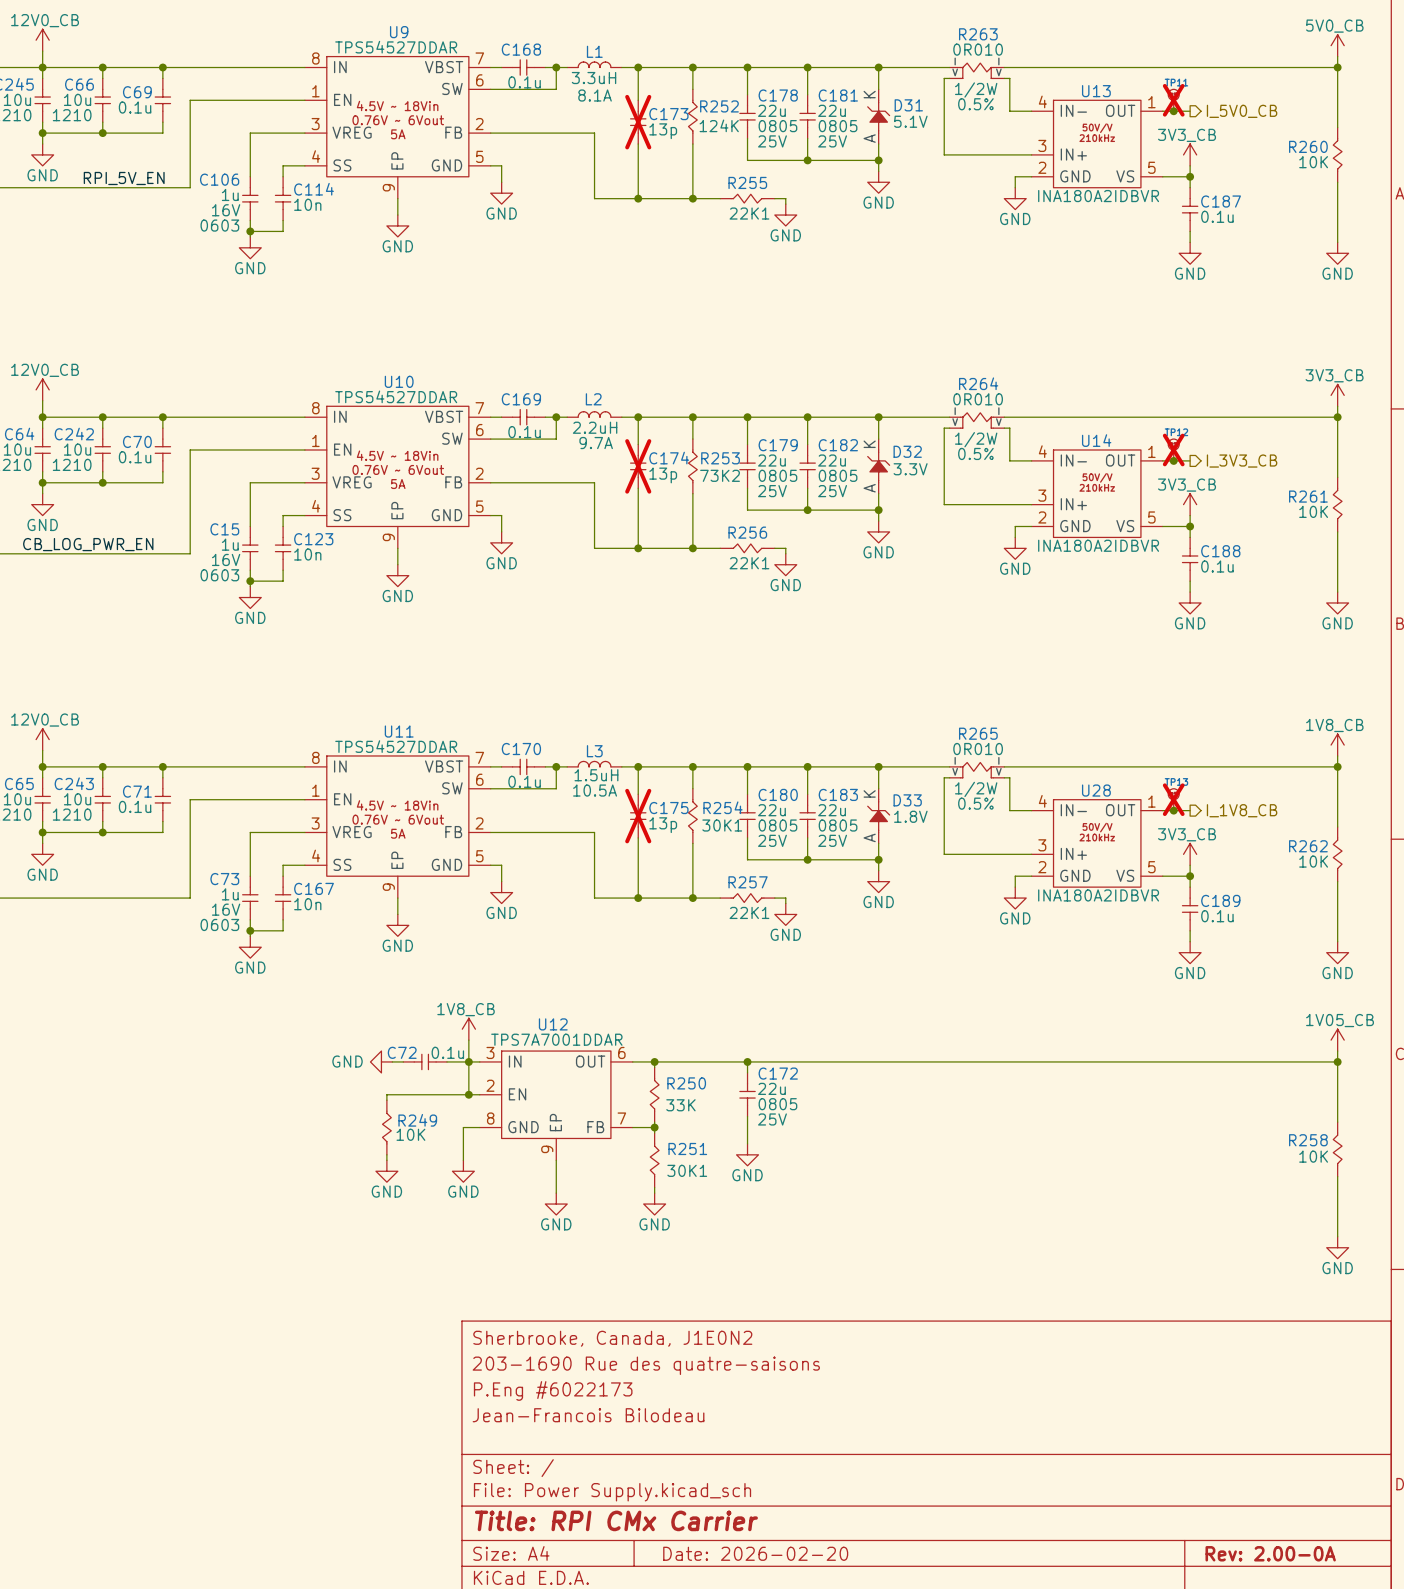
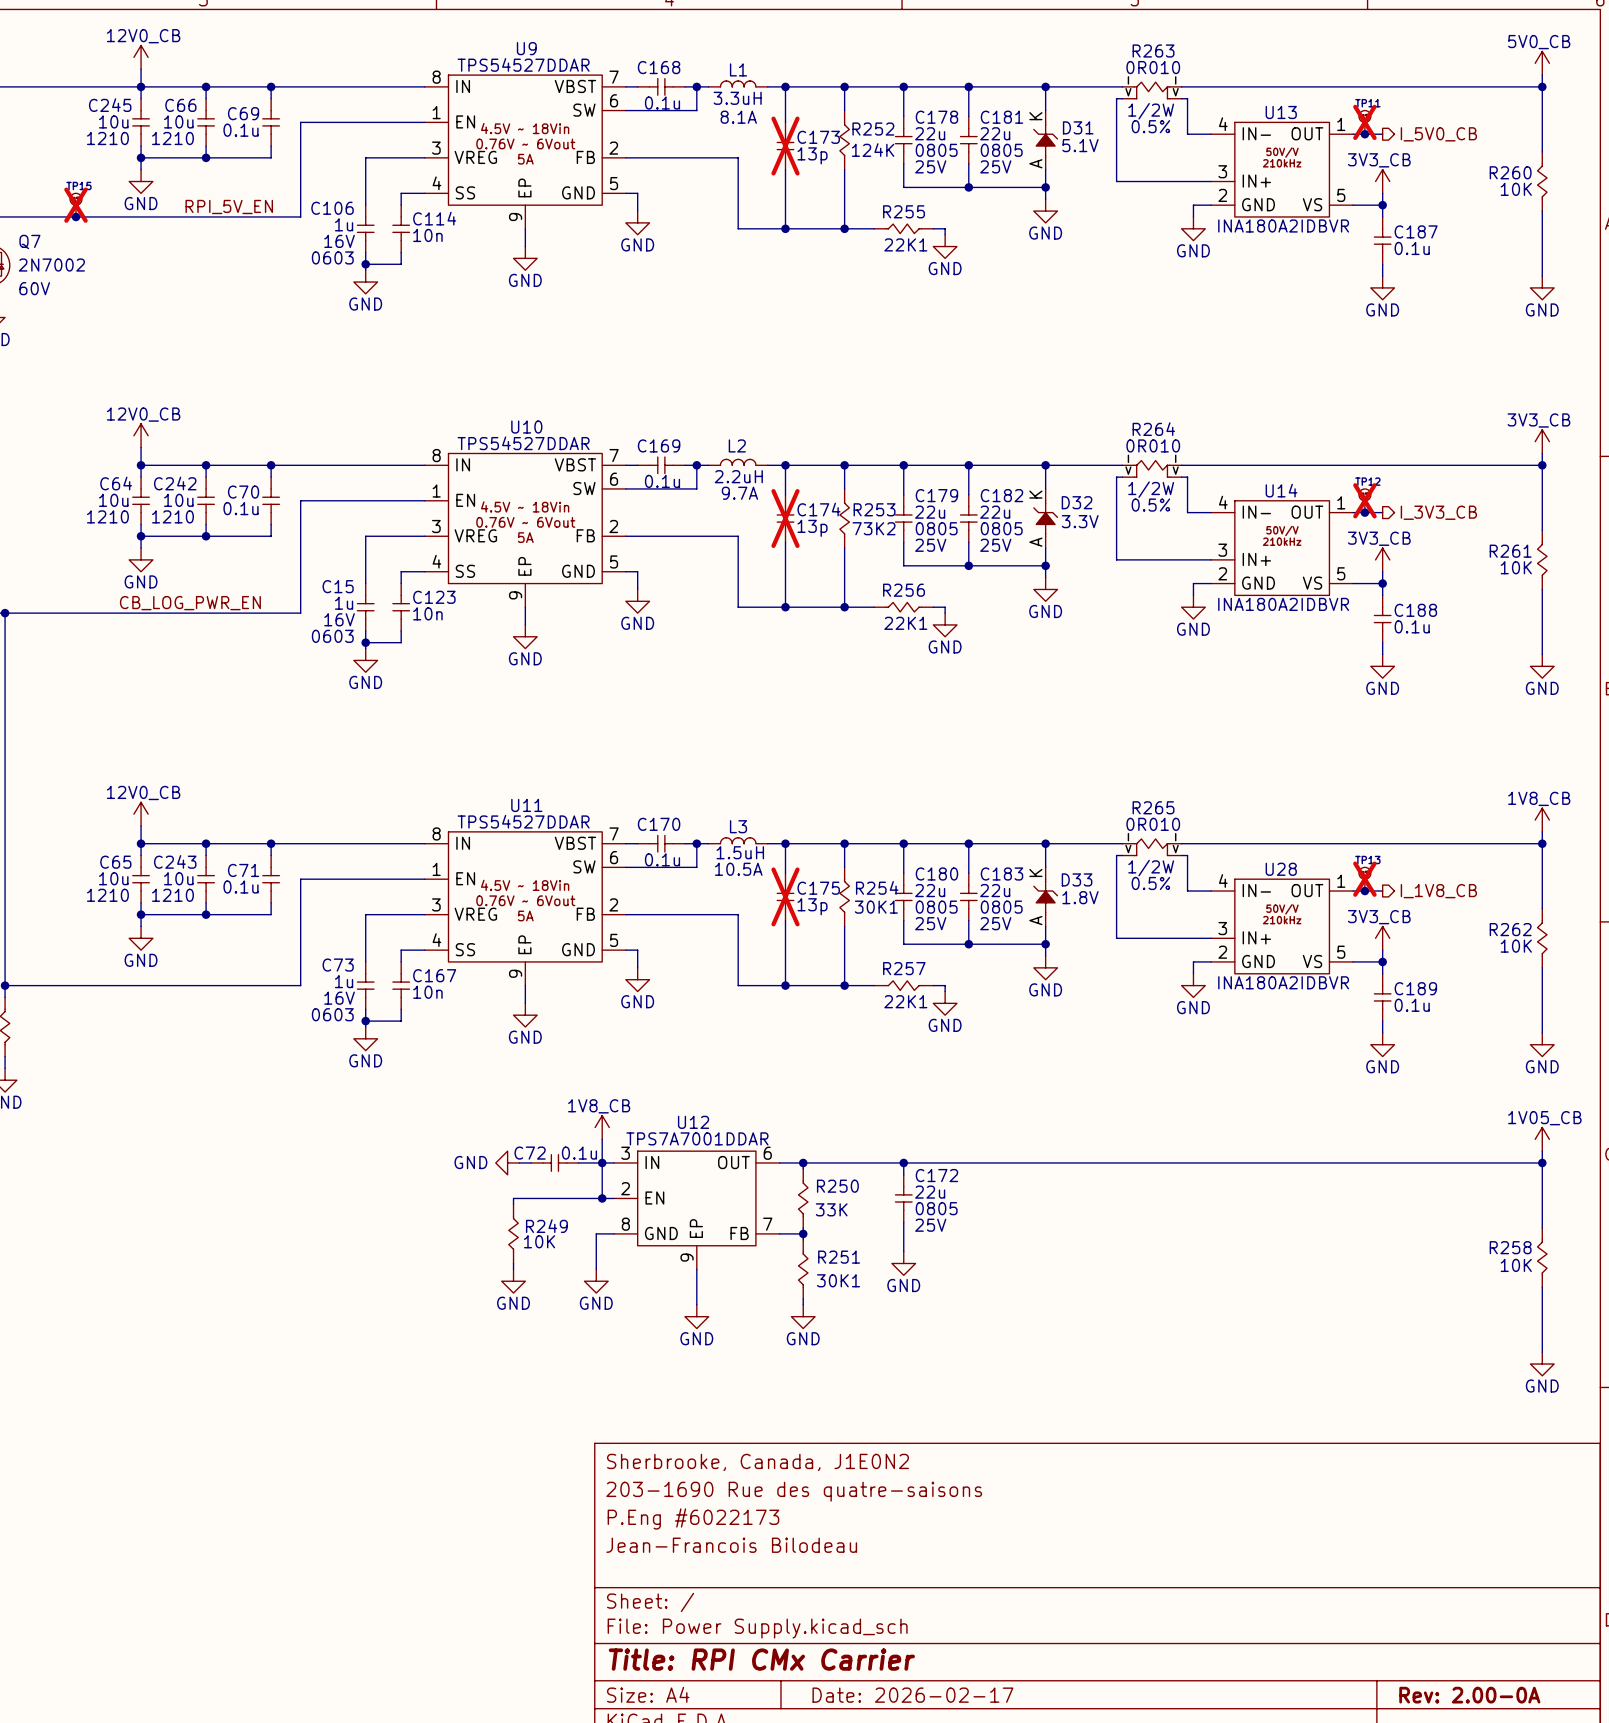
title block: Date: 2026-02-20 (755, 1553) -> Date: 2026-02-17 (912, 1695)

